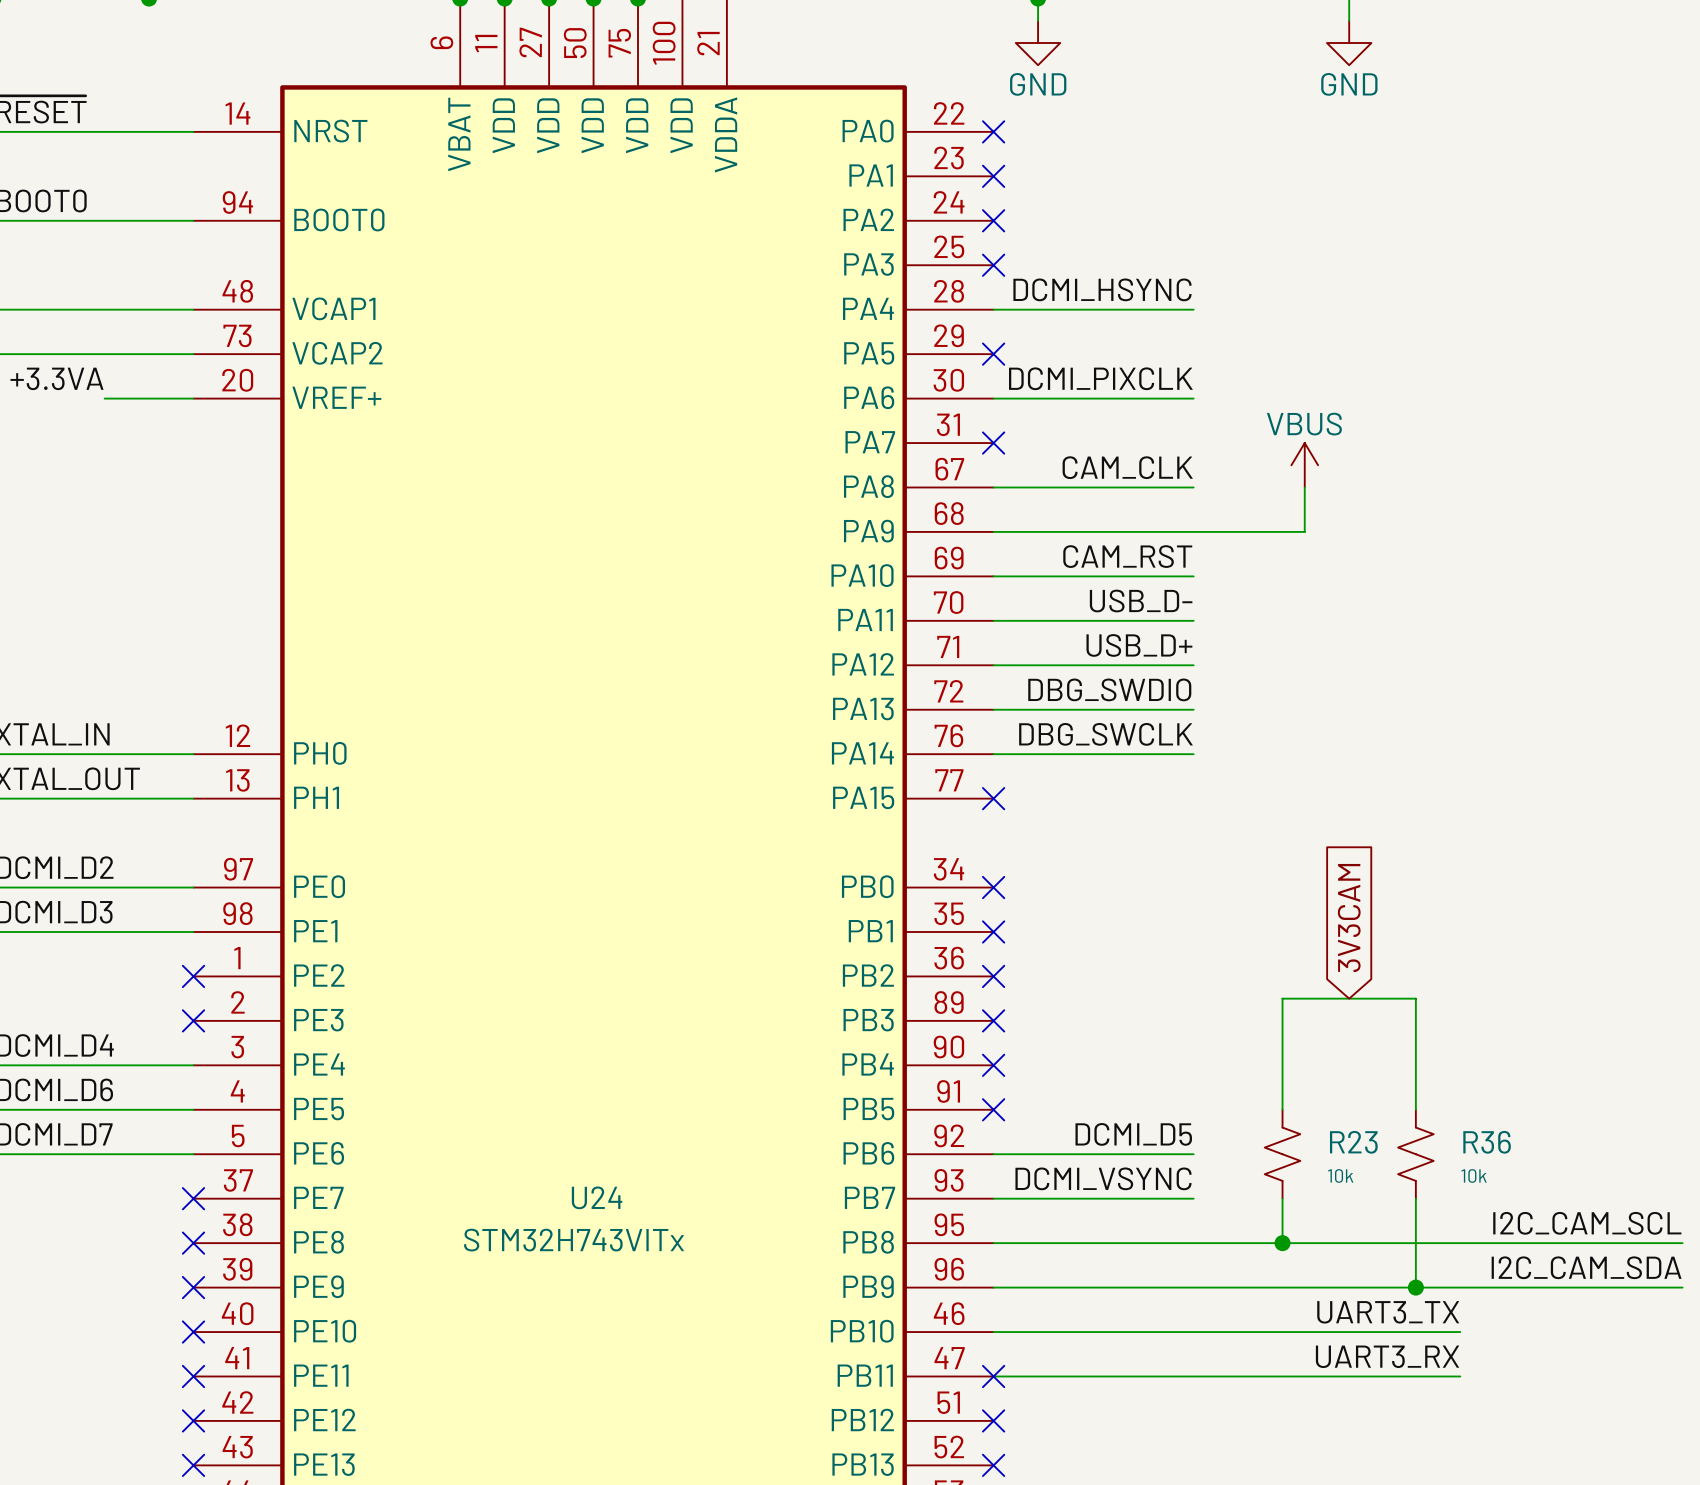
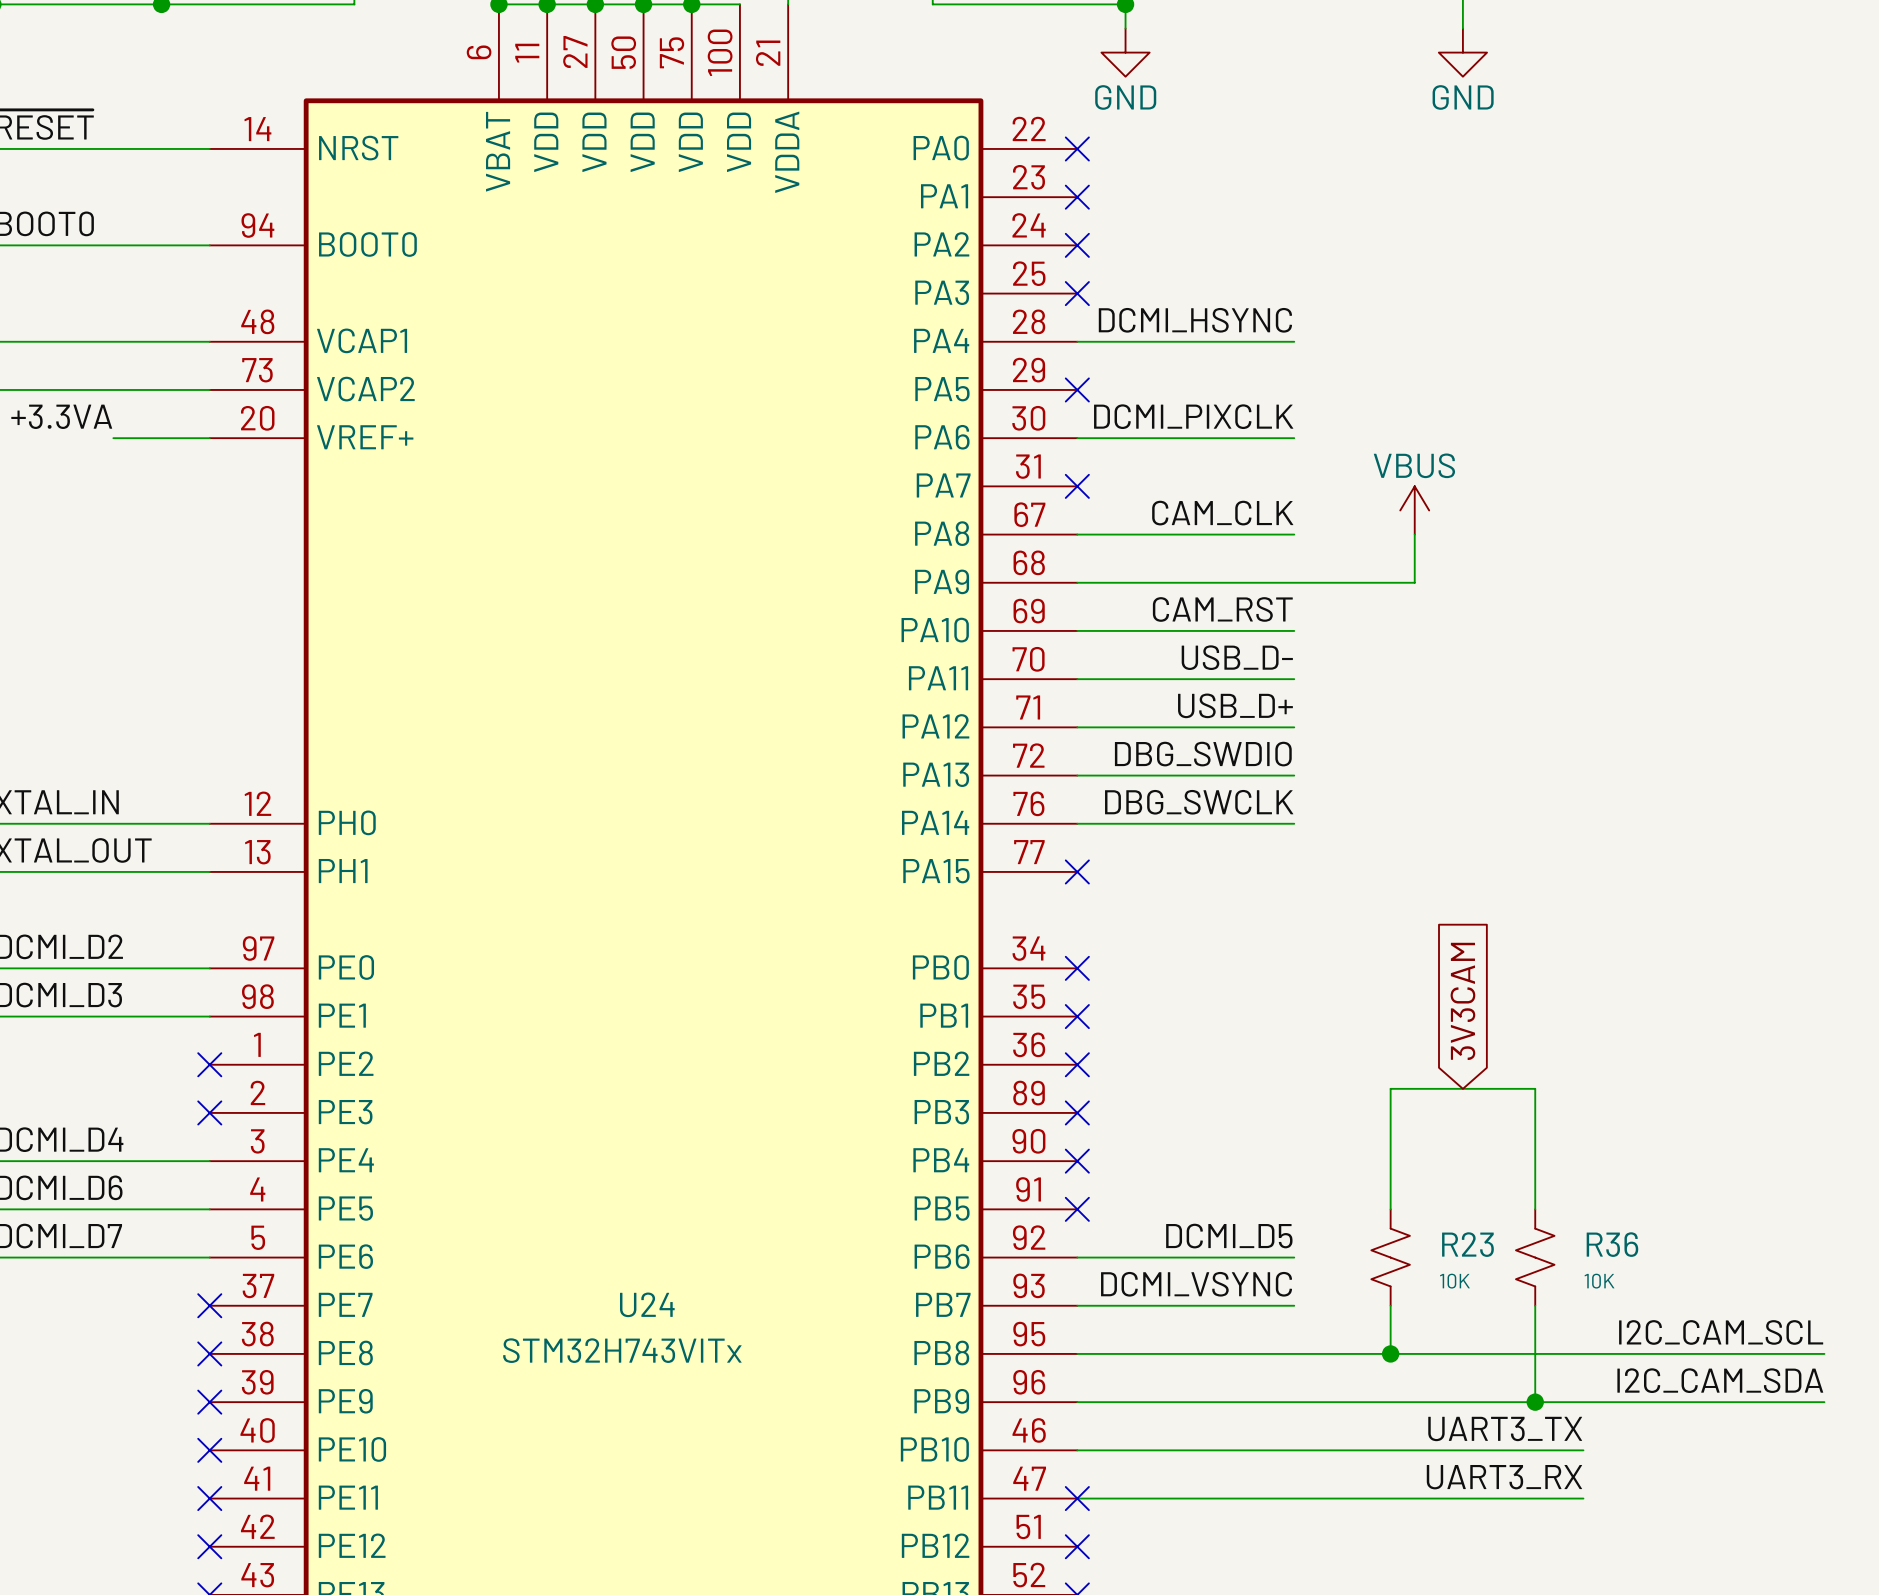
R23 value: 10k (1340, 1175) -> 10K (1454, 1281)
R36 value: 10k (1474, 1175) -> 10K (1599, 1281)

